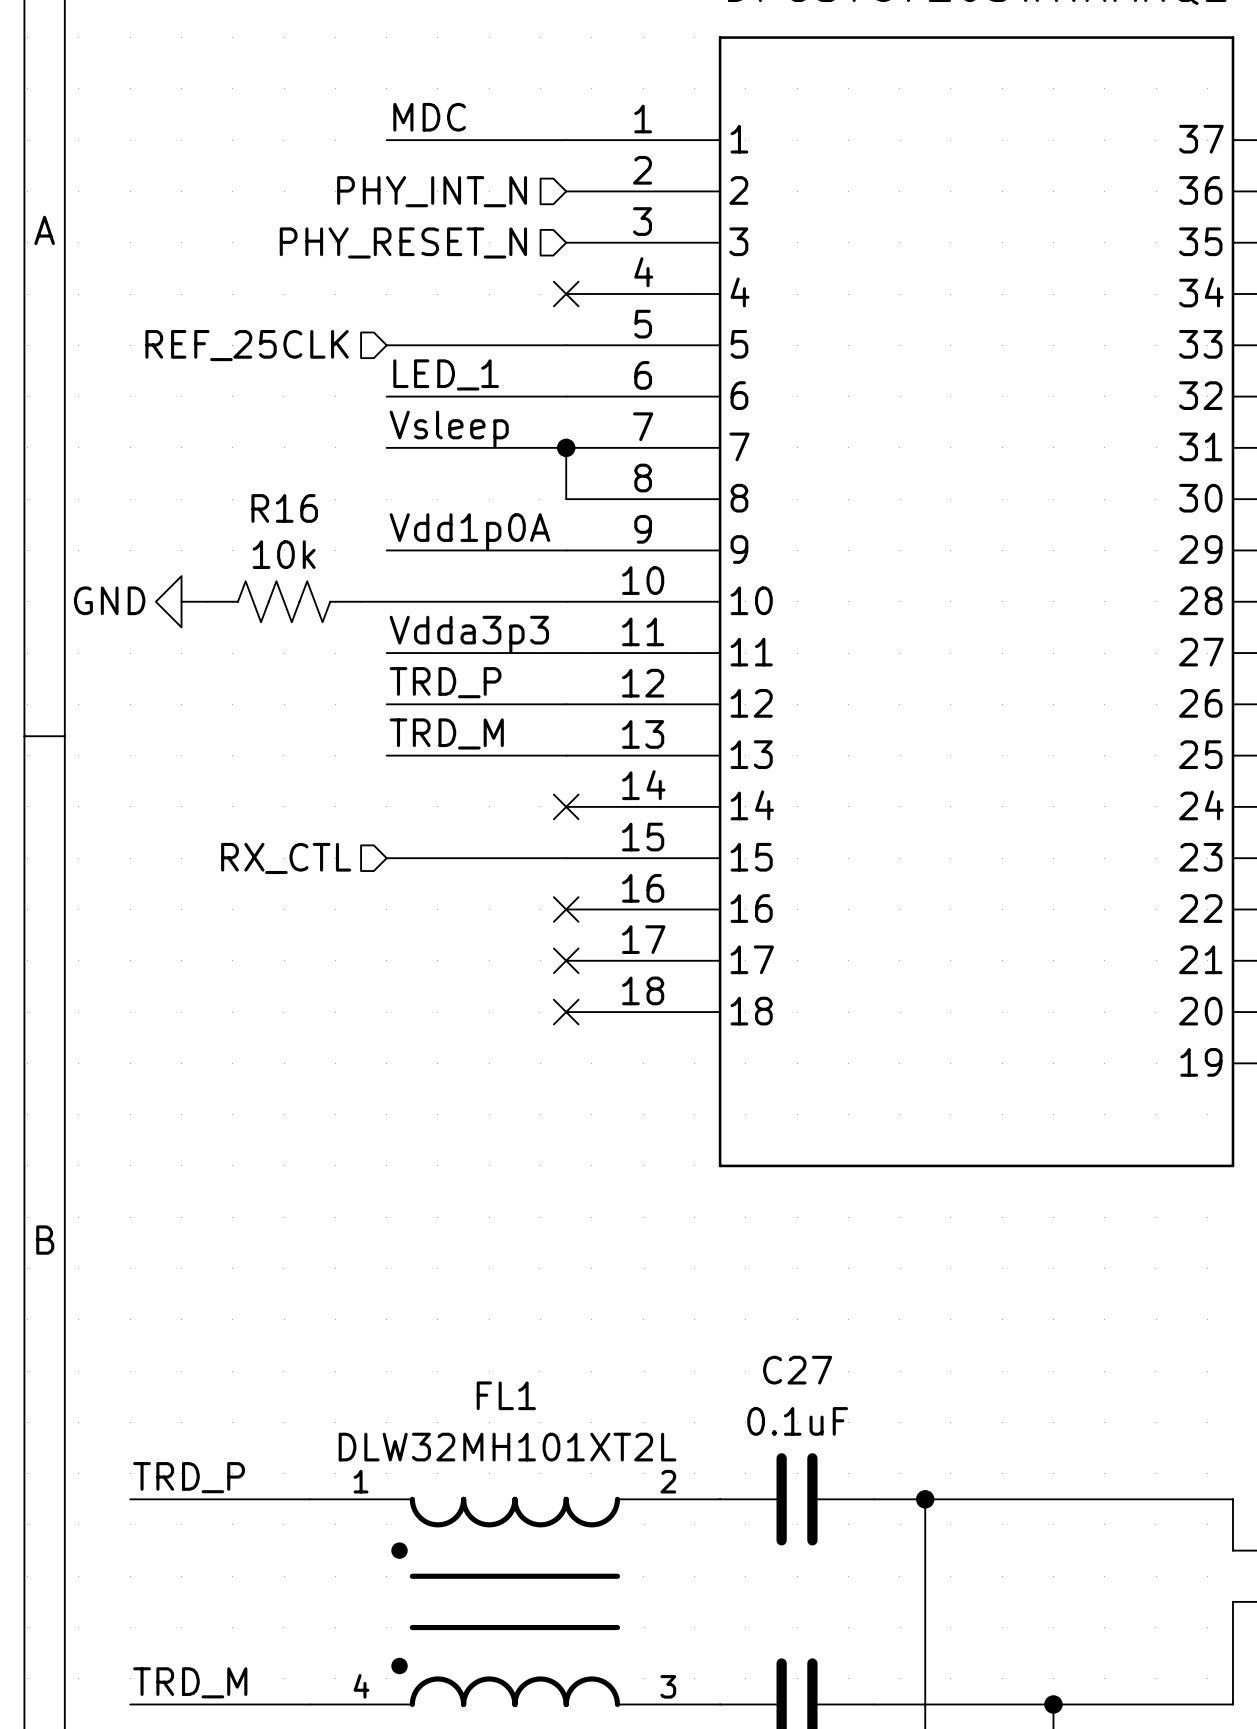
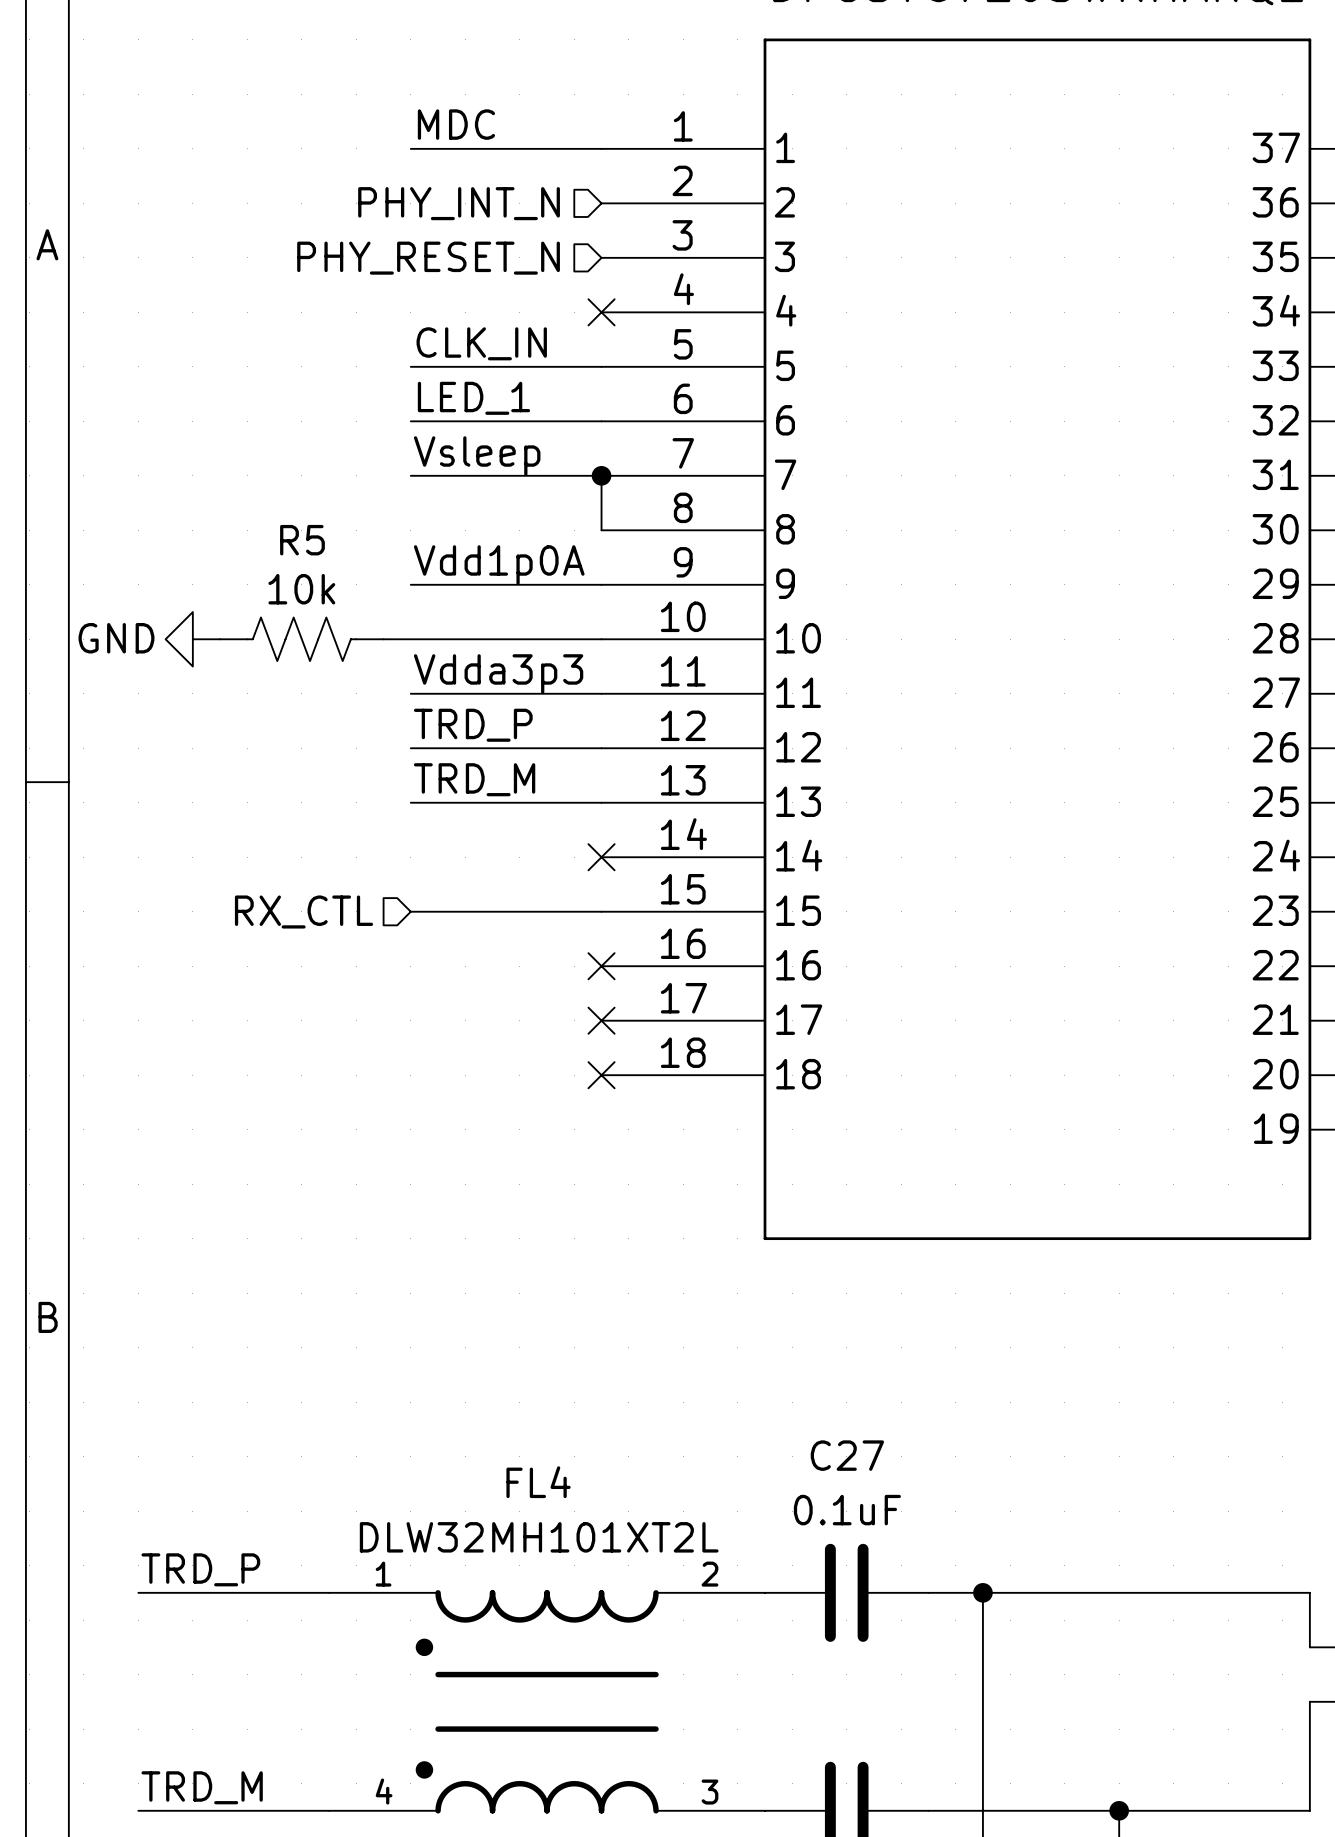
label: none -> CLK_IN (481, 343)
hierarchical label: REF_25CLK (247, 345) -> none
R16 name: R16 (284, 508) -> R5 (302, 540)
FL1 name: FL1 (506, 1395) -> FL4 (538, 1482)

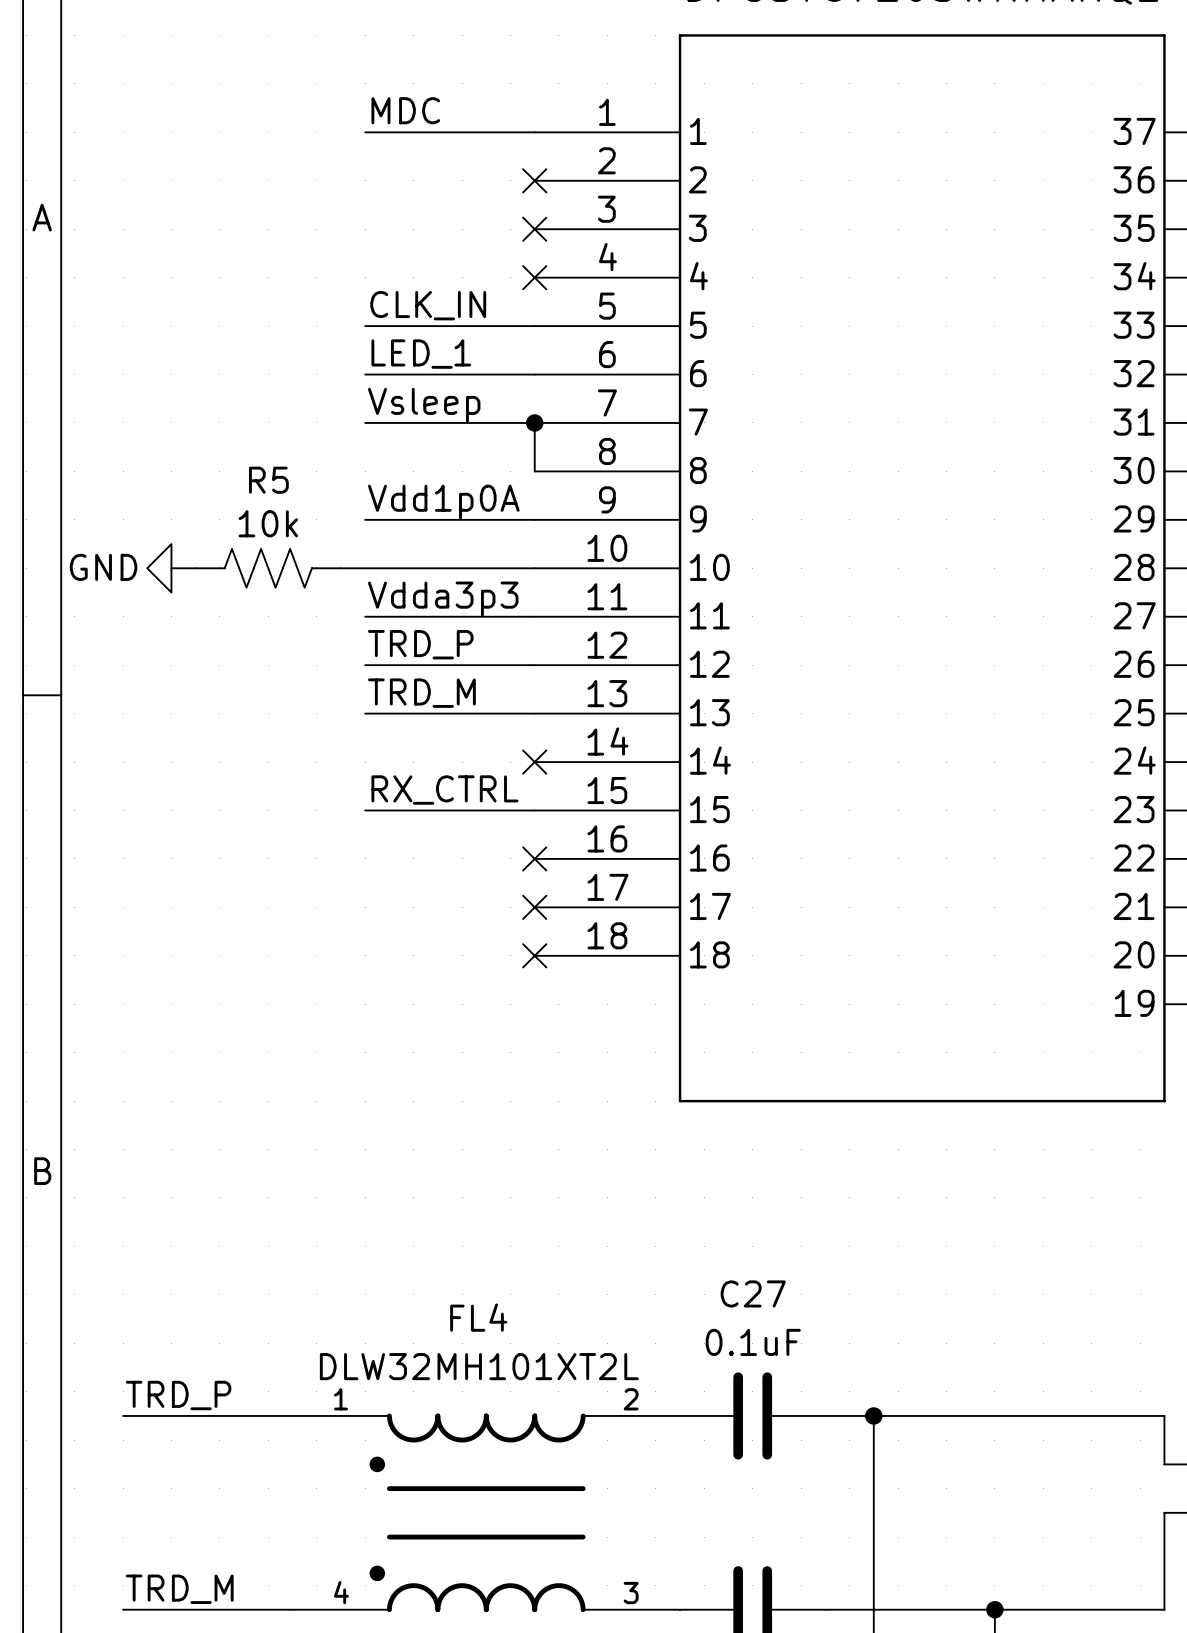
hierarchical label: PHY_INT_N (459, 203) -> none
no-connect mark: none -> (534, 180)
no-connect mark: none -> (534, 229)
hierarchical label: PHY_RESET_N (428, 258) -> none
label: none -> RX_CTRL (444, 790)
hierarchical label: RX_CTL (304, 912) -> none

